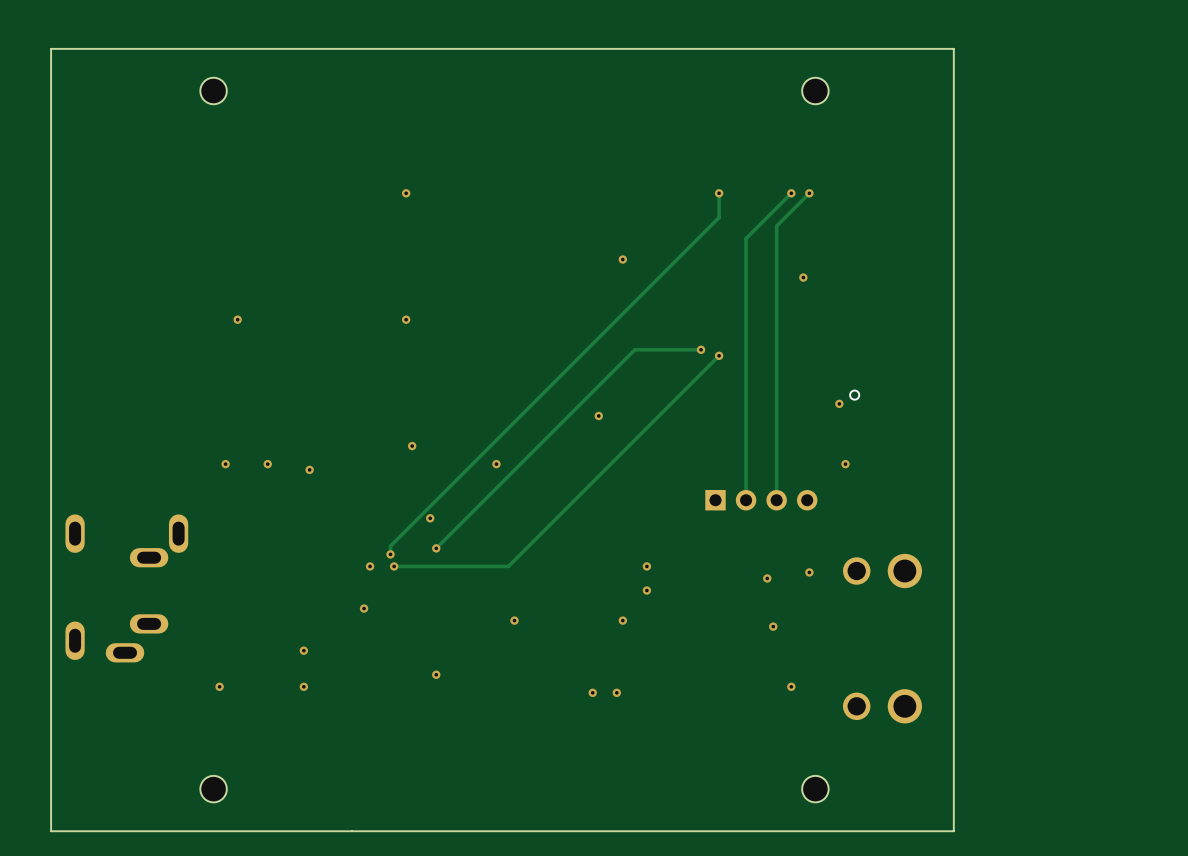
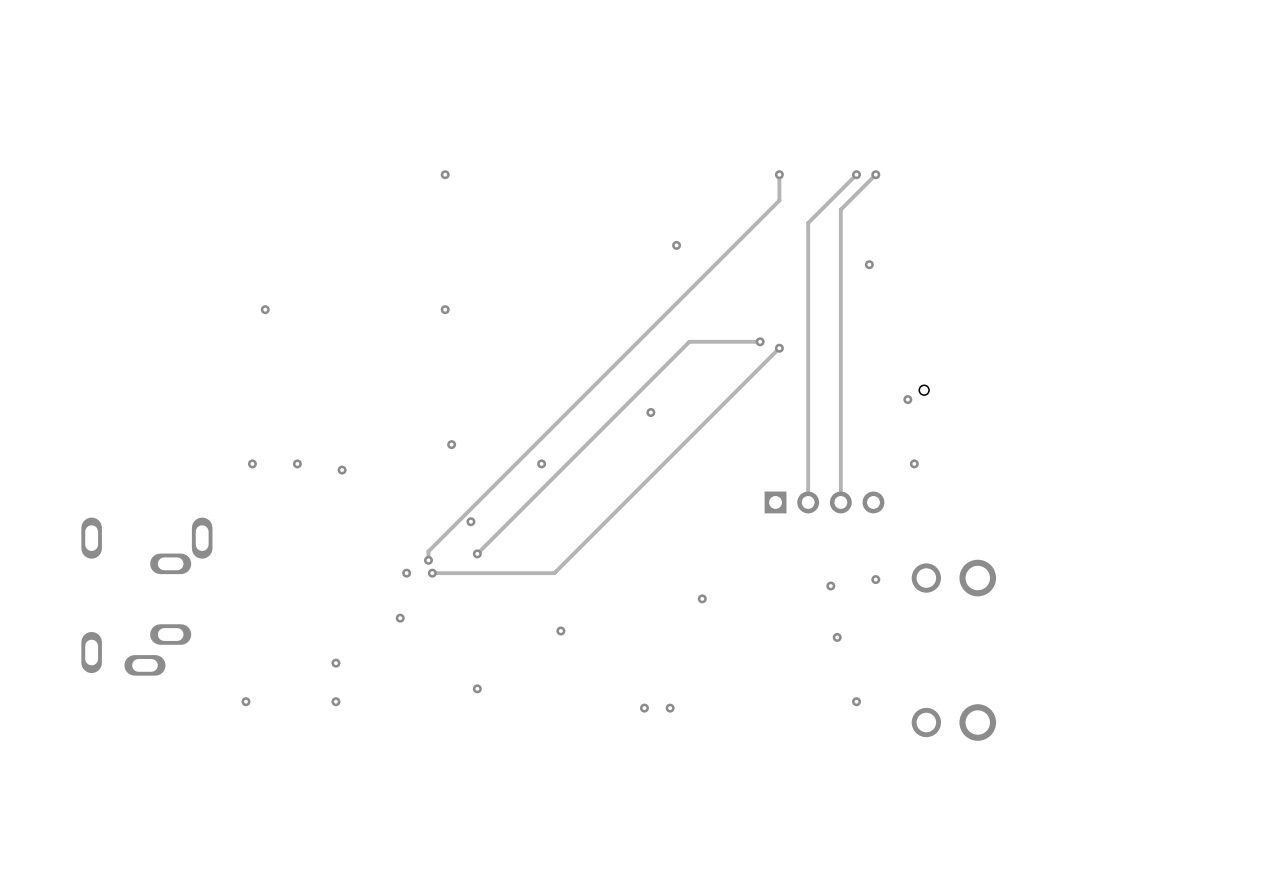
board edge: (953, 48) (51, 48) (51, 831) (953, 831) (953, 48) -> none
part: (213, 91) -> none
part: (815, 91) -> none
via: (646, 566) -> none
via: (622, 620) -> none
part: (213, 789) -> none
part: (815, 789) -> none

